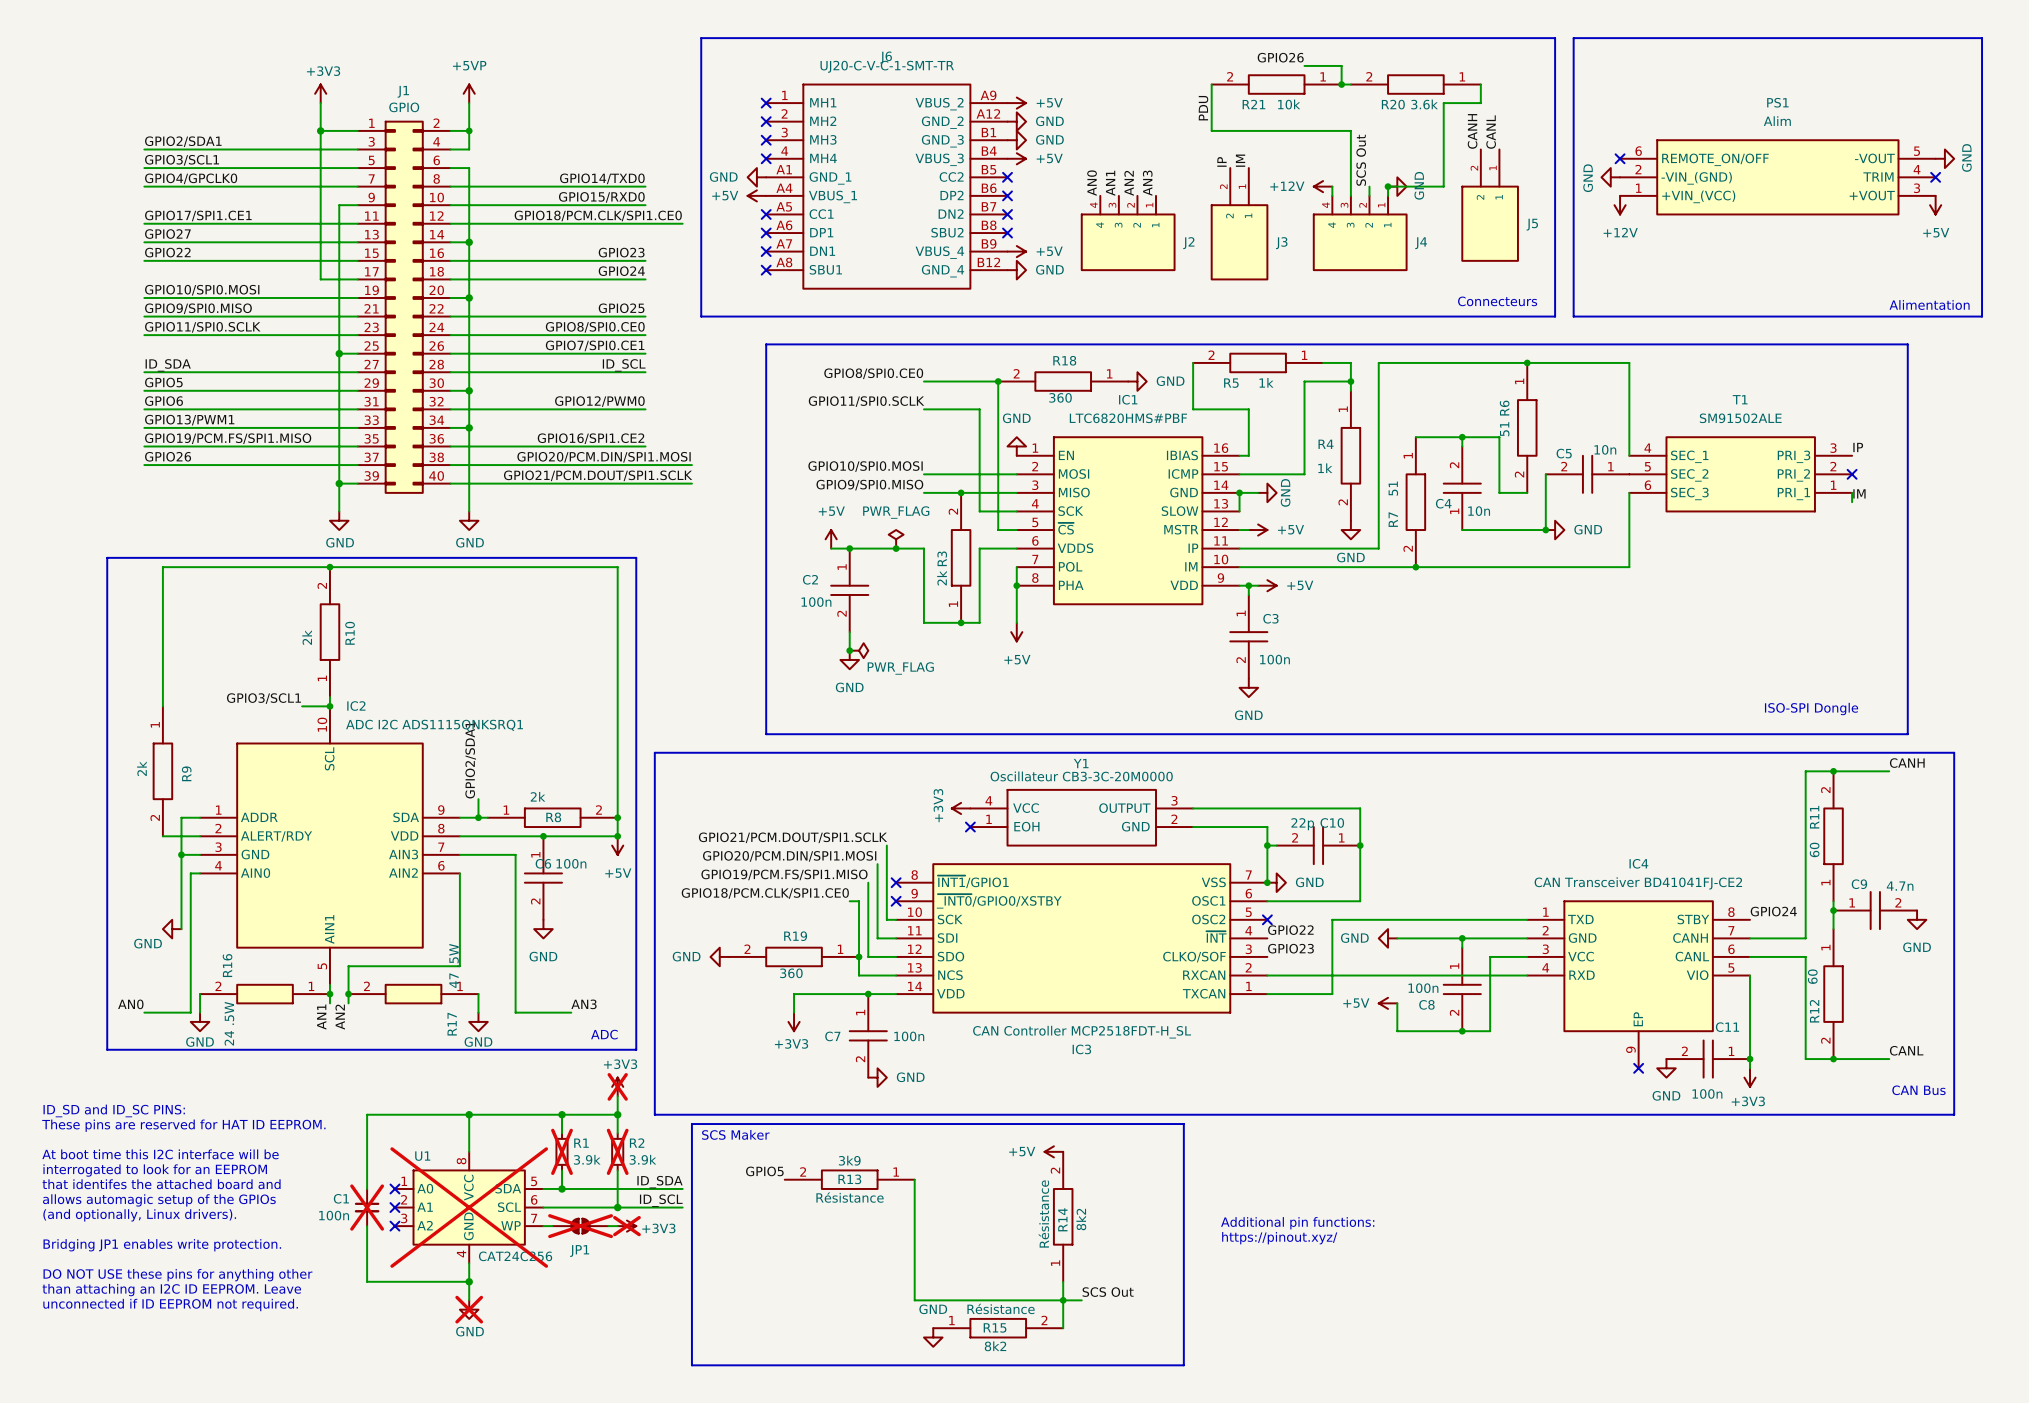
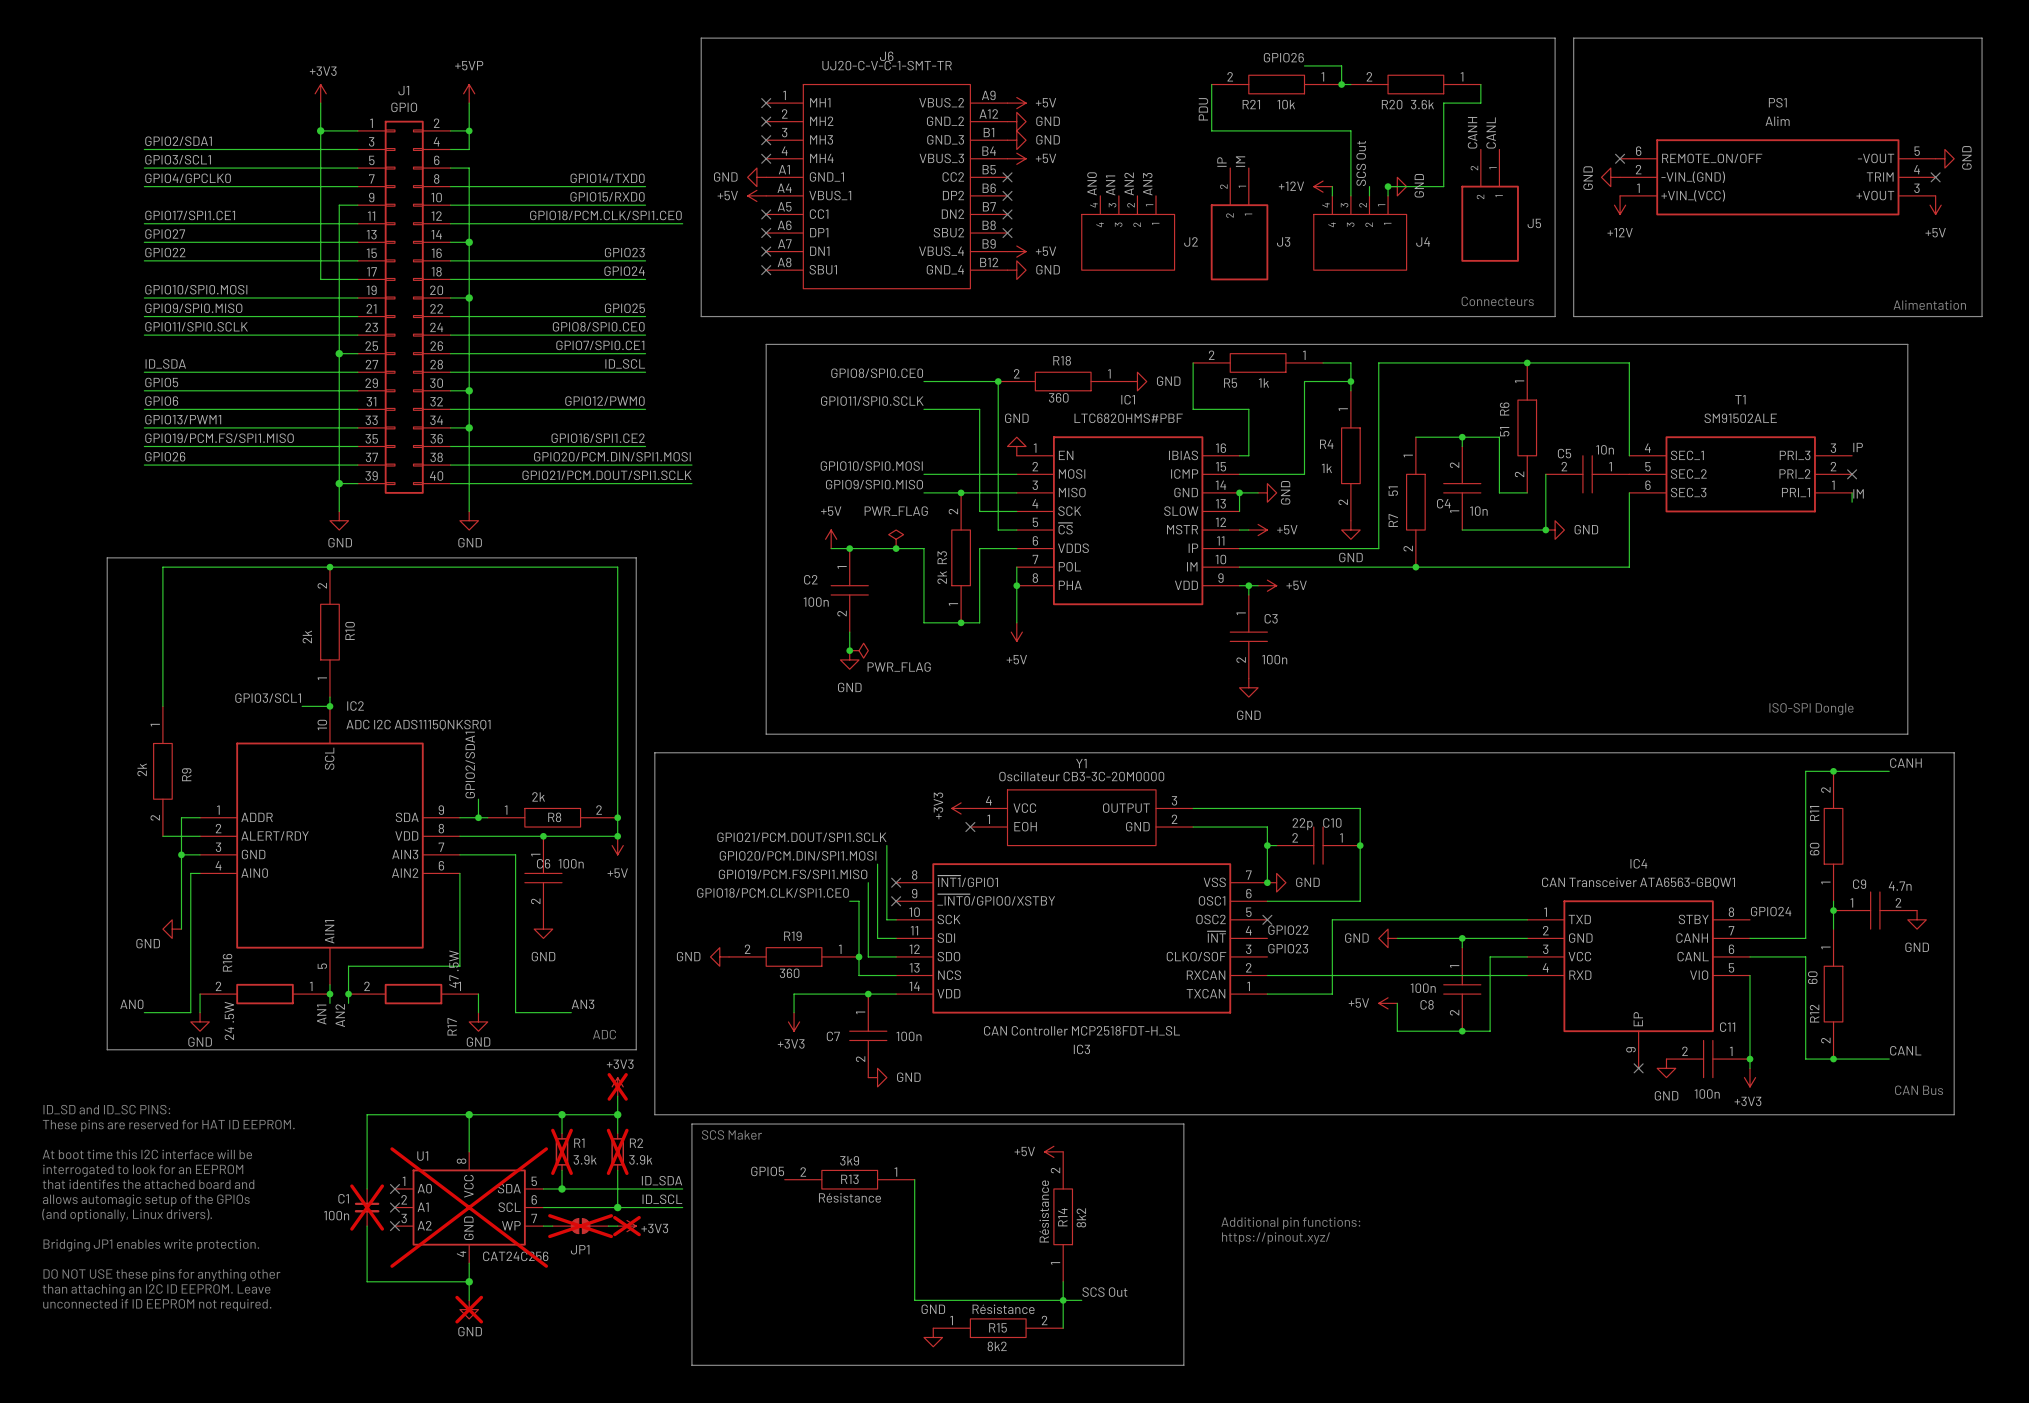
IC4 value: CAN Transceiver BD41041FJ-CE2 (1638, 883) -> CAN Transceiver ATA6563-GBQW1 (1638, 883)

